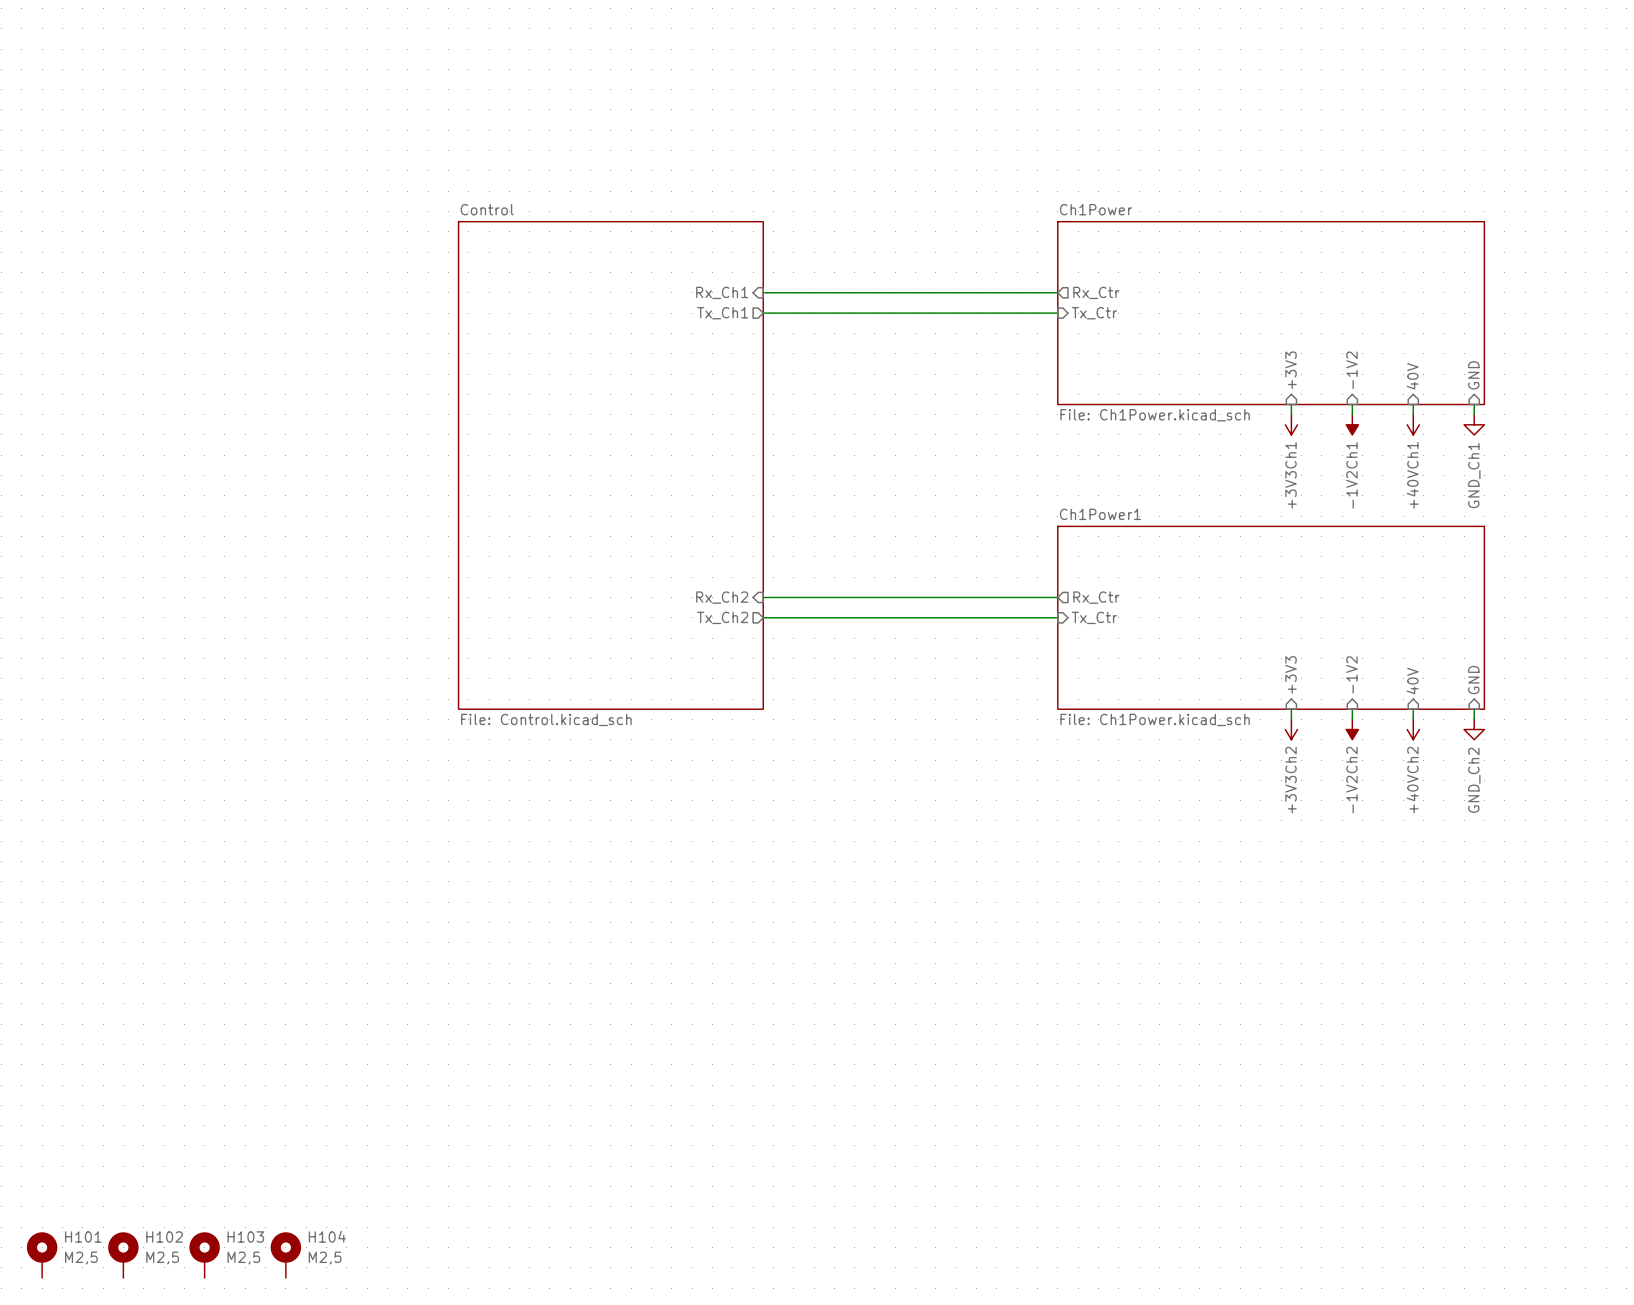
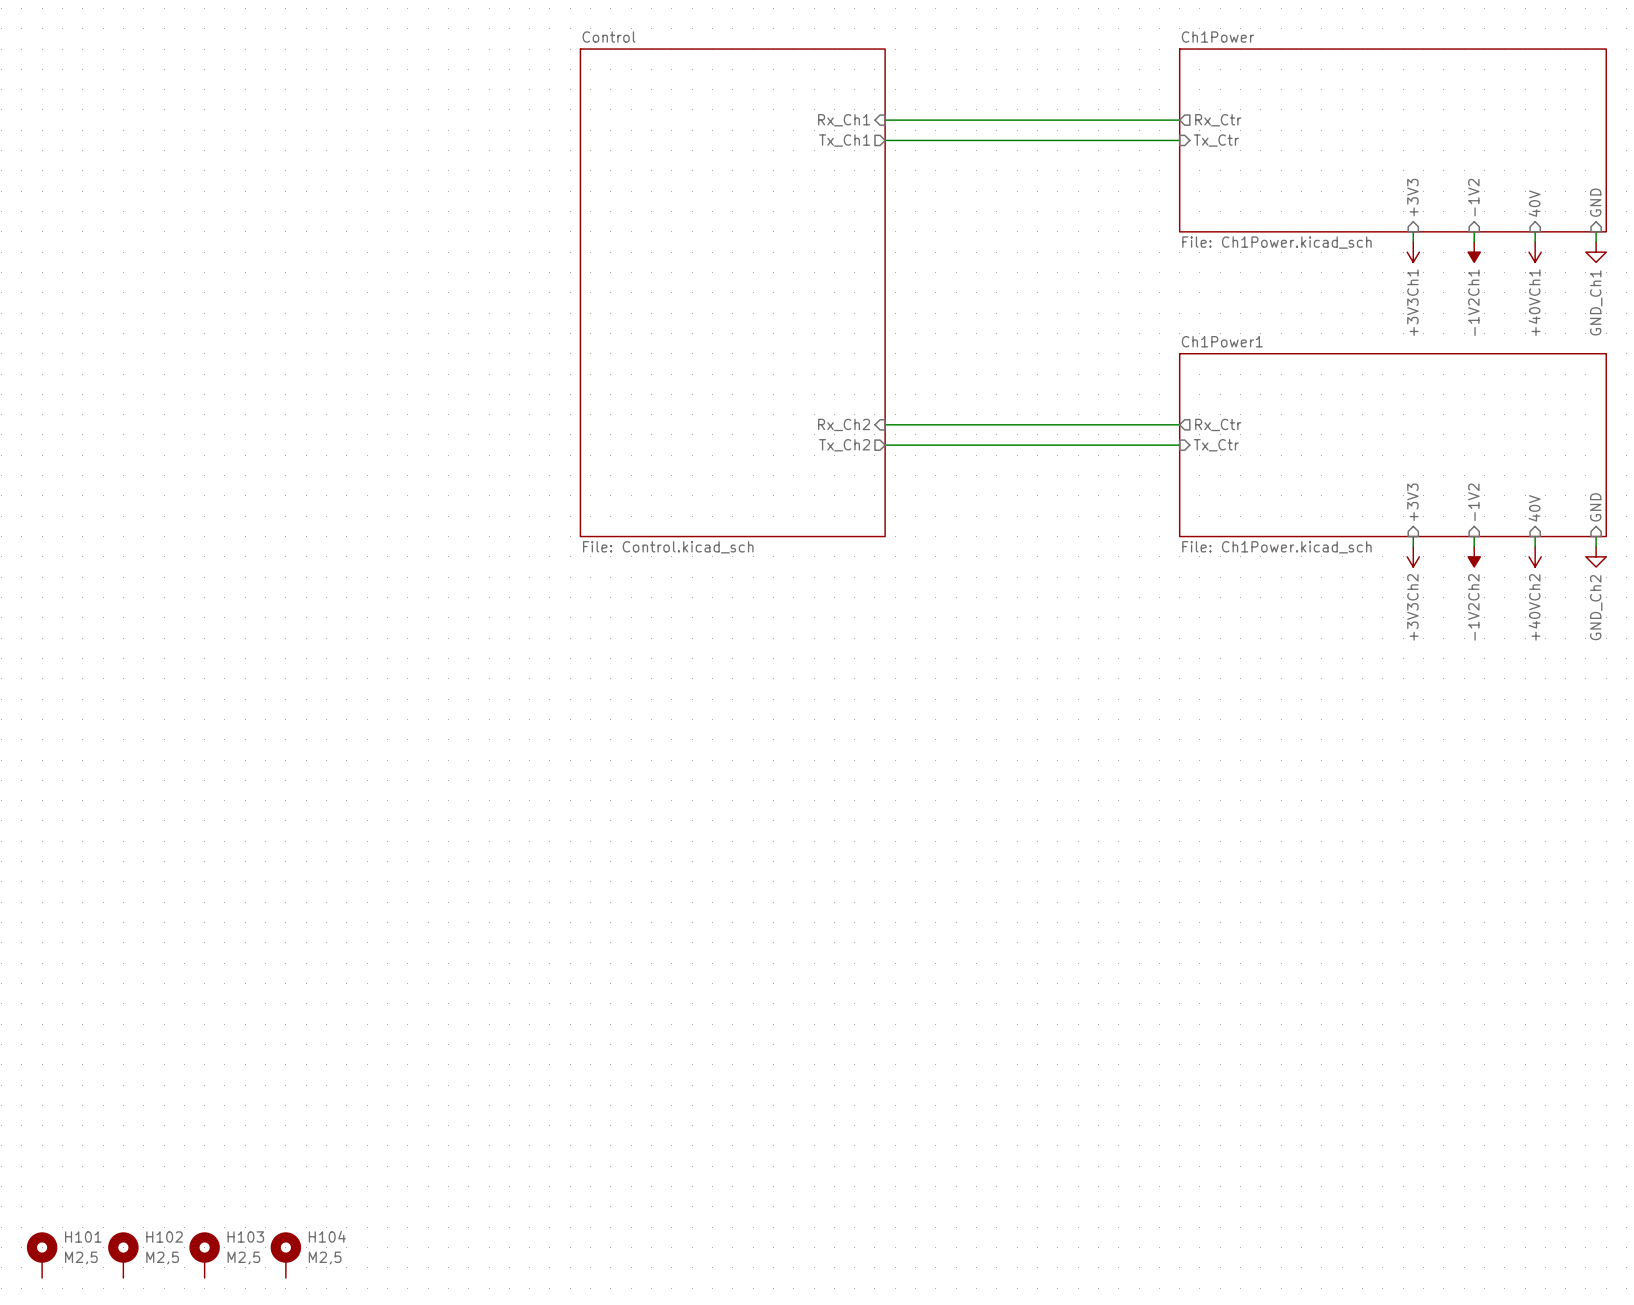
sheet pin: none -> Rx_Ch1 (844, 120)
wire: none -> (885, 120) (1179, 120)
sheet pin: none -> Rx_Ctr (1218, 120)
sheet pin: none -> Tx_Ch1 (844, 140)
wire: none -> (885, 140) (1179, 140)
sheet pin: none -> Tx_Ctr (1216, 140)
sheet pin: none -> +3V3 (1412, 197)
sheet pin: none -> -1V2 (1473, 197)
sheet pin: none -> GND (1595, 202)
sheet pin: none -> 40V (1534, 203)
wire: none -> (1413, 231) (1413, 242)
wire: none -> (1474, 231) (1474, 242)
wire: none -> (1535, 231) (1535, 242)
wire: none -> (1596, 231) (1596, 242)
power symbol: none -> +3V3Ch1 (1413, 252)
power symbol: none -> -1V2Ch1 (1474, 252)
power symbol: none -> +40VCh1 (1535, 252)
power symbol: none -> GND_Ch1 (1596, 252)
sheet pin: Rx_Ch1 (722, 292) -> none
sheet Control: none -> File: Control.kicad_sch (732, 292)
wire: (763, 292) (1057, 292) -> (885, 424) (1179, 424)
sheet pin: Rx_Ctr (1096, 292) -> none
sheet pin: Tx_Ch1 (722, 313) -> none
wire: (763, 313) (1057, 313) -> (885, 445) (1179, 445)
sheet pin: Tx_Ctr (1094, 313) -> none
sheet Ch1Power position: (1271, 313) -> (1392, 140)
sheet pin: +3V3 (1291, 370) -> none
sheet pin: -1V2 (1351, 370) -> none
sheet pin: GND (1473, 375) -> none
sheet pin: 40V (1412, 376) -> none
wire: (1291, 404) (1291, 414) -> (1413, 536) (1413, 546)
wire: (1352, 404) (1352, 414) -> (1474, 536) (1474, 546)
wire: (1413, 404) (1413, 414) -> (1535, 536) (1535, 546)
wire: (1474, 404) (1474, 414) -> (1596, 536) (1596, 546)
sheet pin: none -> Rx_Ch2 (844, 424)
sheet pin: none -> Rx_Ctr (1218, 424)
power symbol: +3V3Ch1 (1291, 424) -> none
power symbol: -1V2Ch1 (1352, 424) -> none
power symbol: +40VCh1 (1413, 424) -> none
power symbol: GND_Ch1 (1474, 424) -> none
sheet pin: none -> Tx_Ch2 (844, 445)
sheet pin: none -> Tx_Ctr (1216, 445)
sheet Control: File: Control.kicad_sch (610, 465) -> none
sheet pin: none -> +3V3 (1412, 502)
sheet pin: none -> -1V2 (1473, 502)
sheet pin: none -> GND (1595, 507)
sheet pin: none -> 40V (1534, 508)
power symbol: none -> +3V3Ch2 (1413, 556)
power symbol: none -> -1V2Ch2 (1474, 556)
power symbol: none -> +40VCh2 (1535, 556)
power symbol: none -> GND_Ch2 (1596, 556)
sheet pin: Rx_Ch2 (722, 597) -> none
wire: (763, 597) (1057, 597) -> none
sheet pin: Rx_Ctr (1096, 597) -> none
sheet pin: Tx_Ch2 (722, 617) -> none
wire: (763, 617) (1057, 617) -> none
sheet pin: Tx_Ctr (1094, 617) -> none
sheet Ch1Power1 position: (1271, 617) -> (1392, 445)
sheet pin: +3V3 (1291, 674) -> none
sheet pin: -1V2 (1351, 674) -> none
sheet pin: GND (1473, 680) -> none
sheet pin: 40V (1412, 681) -> none
wire: (1291, 709) (1291, 719) -> none
wire: (1352, 709) (1352, 719) -> none
wire: (1413, 709) (1413, 719) -> none
wire: (1474, 709) (1474, 719) -> none
power symbol: +3V3Ch2 (1291, 729) -> none
power symbol: -1V2Ch2 (1352, 729) -> none
power symbol: +40VCh2 (1413, 729) -> none
power symbol: GND_Ch2 (1474, 729) -> none

